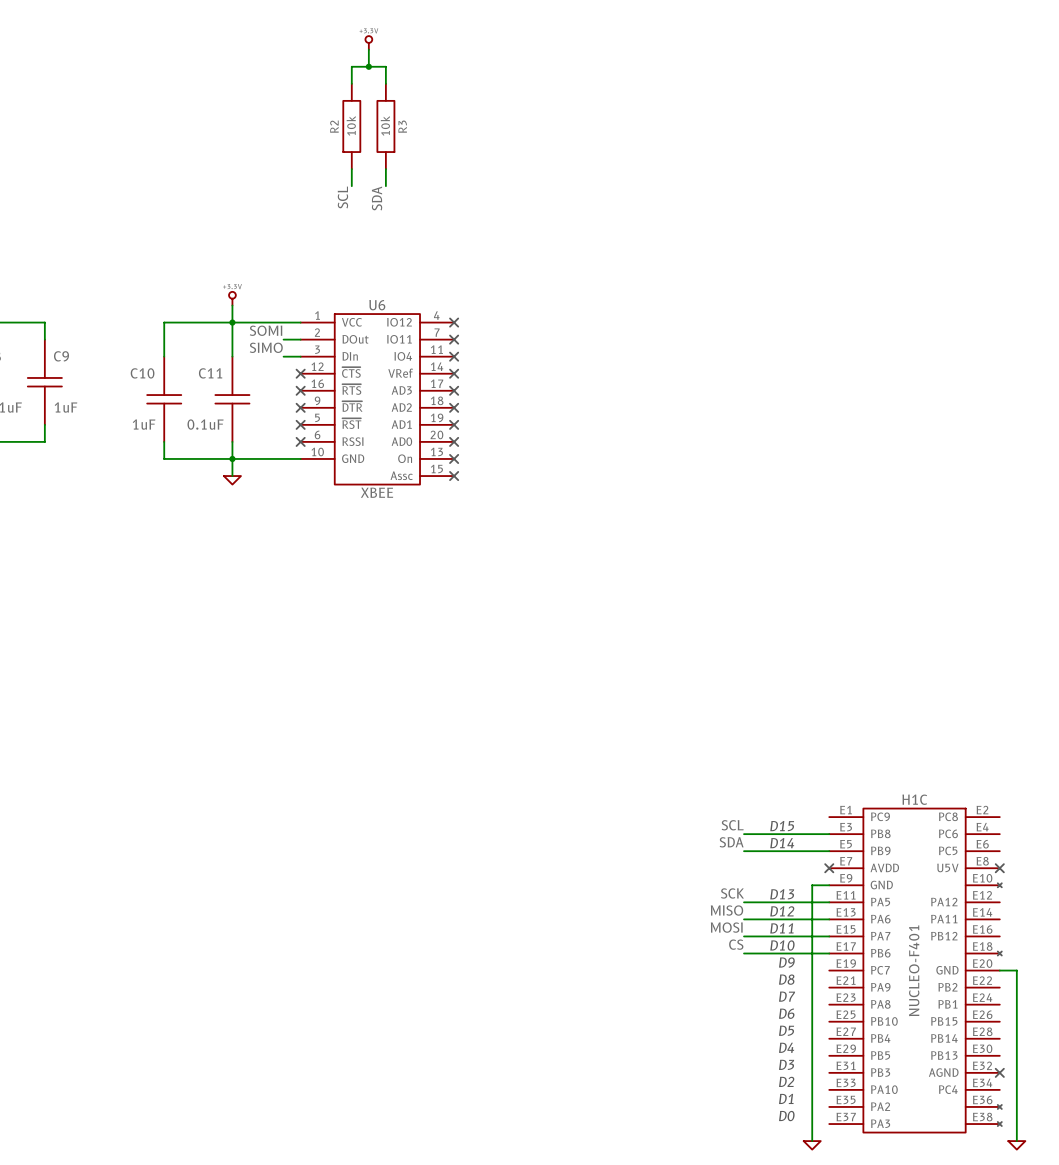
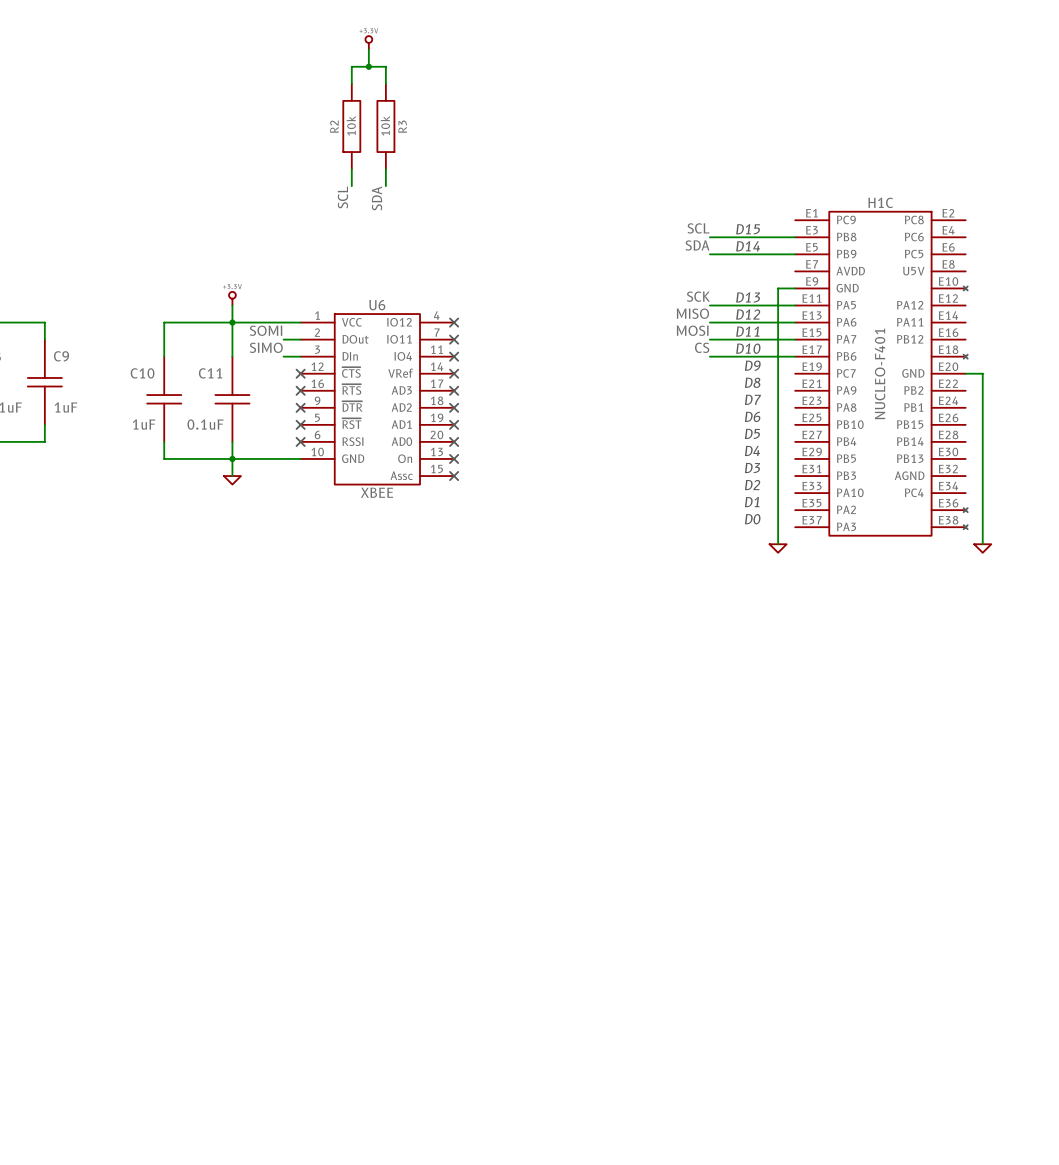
label: none -> SCL (698, 228)
text: none -> D15 (748, 229)
wire: none -> (709, 237) (795, 237)
label: none -> SDA (697, 245)
text: none -> D14 (748, 246)
wire: none -> (709, 254) (795, 254)
wire: none -> (795, 288) (778, 288) (778, 544)
label: none -> SCK (698, 296)
text: none -> D13 (748, 297)
wire: none -> (709, 305) (795, 305)
label: none -> MISO (692, 313)
text: none -> D12 (748, 314)
wire: none -> (709, 322) (795, 322)
label: none -> MOSI (692, 330)
text: none -> D11 (747, 331)
wire: none -> (709, 339) (795, 339)
label: none -> CS (702, 347)
text: none -> D10 (748, 348)
wire: none -> (709, 356) (795, 356)
text: none -> D9 (752, 365)
wire: none -> (965, 373) (982, 373) (982, 544)
text: none -> D8 (752, 382)
text: none -> D7 (752, 399)
text: none -> D6 (752, 416)
text: none -> D5 (752, 433)
text: none -> D4 (752, 450)
text: none -> D3 (752, 468)
text: none -> D2 (752, 485)
text: none -> D1 (752, 502)
text: none -> D0 (752, 519)
power symbol: none -> (778, 548)
power symbol: none -> (982, 548)
label: SCL (732, 825) -> none
text: D15 (782, 826) -> none
wire: (744, 834) (829, 834) -> none
label: SDA (731, 842) -> none
text: D14 (782, 843) -> none
wire: (744, 851) (829, 851) -> none
no-connect mark: (829, 868) -> none
no-connect mark: (999, 868) -> none
wire: (829, 885) (812, 885) (812, 1141) -> none
label: SCK (732, 893) -> none
text: D13 (782, 894) -> none
wire: (744, 902) (829, 902) -> none
label: MISO (727, 910) -> none
text: D12 (782, 911) -> none
wire: (744, 919) (829, 919) -> none
label: MOSI (726, 927) -> none
text: D11 (781, 928) -> none
wire: (744, 936) (829, 936) -> none
label: CS (736, 944) -> none
text: D10 (782, 945) -> none
wire: (744, 953) (829, 953) -> none
text: D9 (786, 962) -> none
H1C position: (915, 970) -> (881, 373)
wire: (999, 970) (1016, 970) (1016, 1141) -> none
text: D8 (786, 979) -> none
text: D7 (787, 996) -> none
text: D6 (786, 1013) -> none
text: D5 (786, 1030) -> none
text: D4 (786, 1047) -> none
text: D3 (786, 1064) -> none
no-connect mark: (999, 1072) -> none
text: D2 (786, 1081) -> none
text: D1 (786, 1098) -> none
text: D0 (786, 1116) -> none
power symbol: (812, 1145) -> none
power symbol: (1016, 1145) -> none

